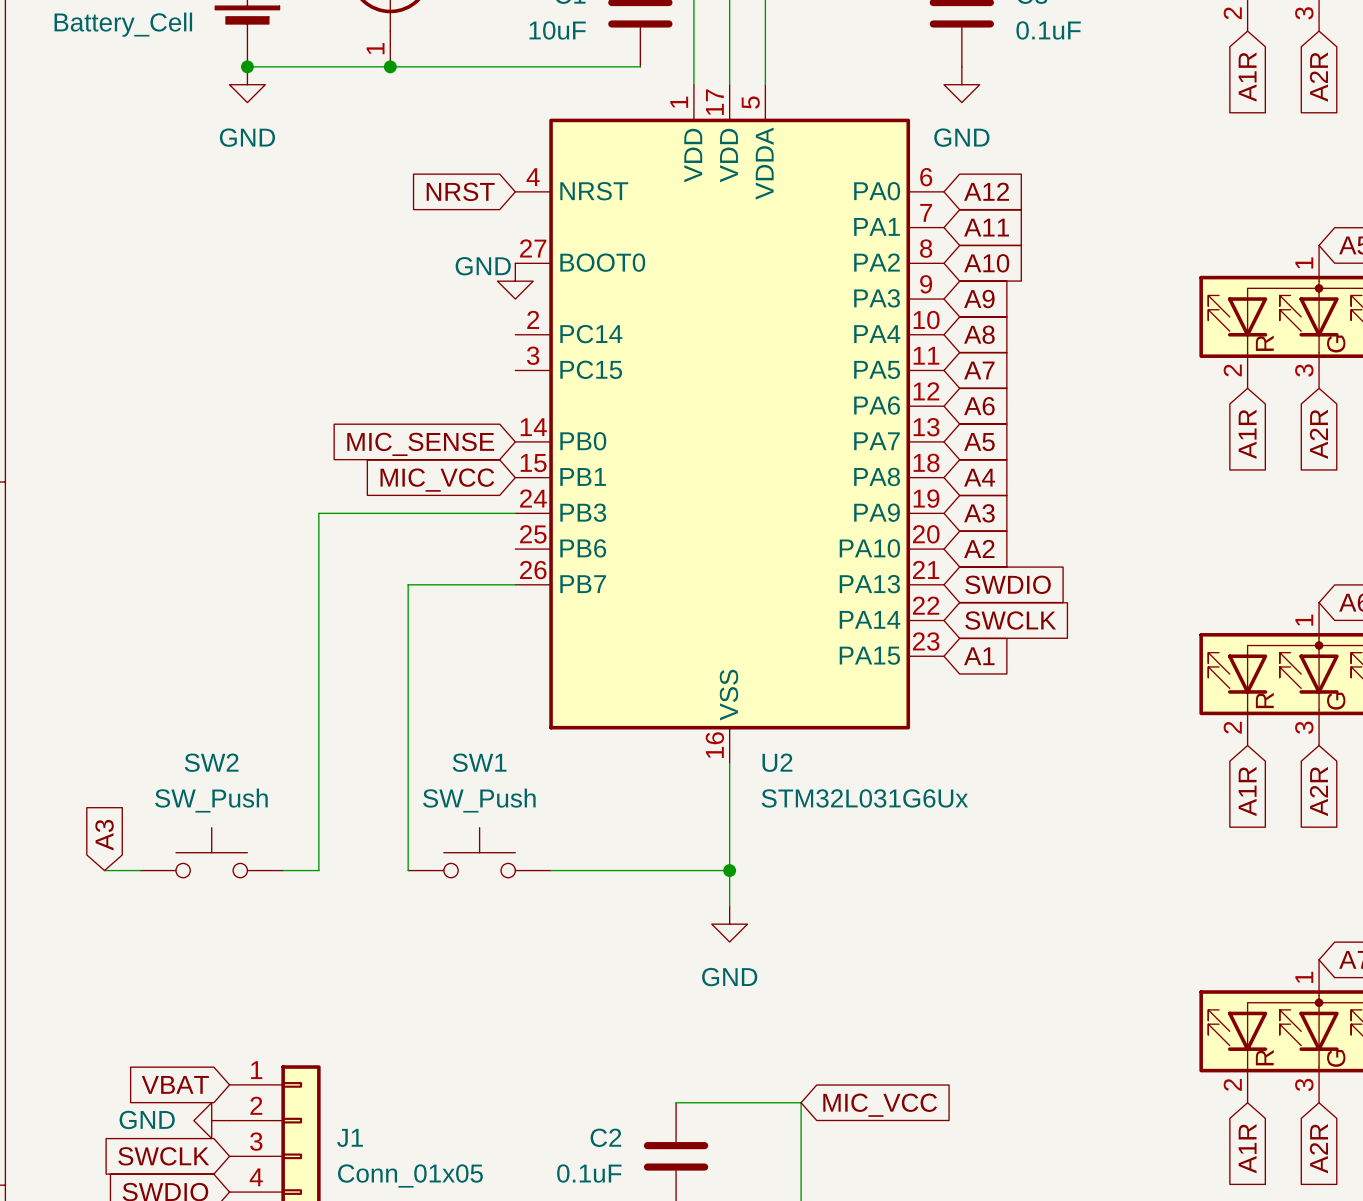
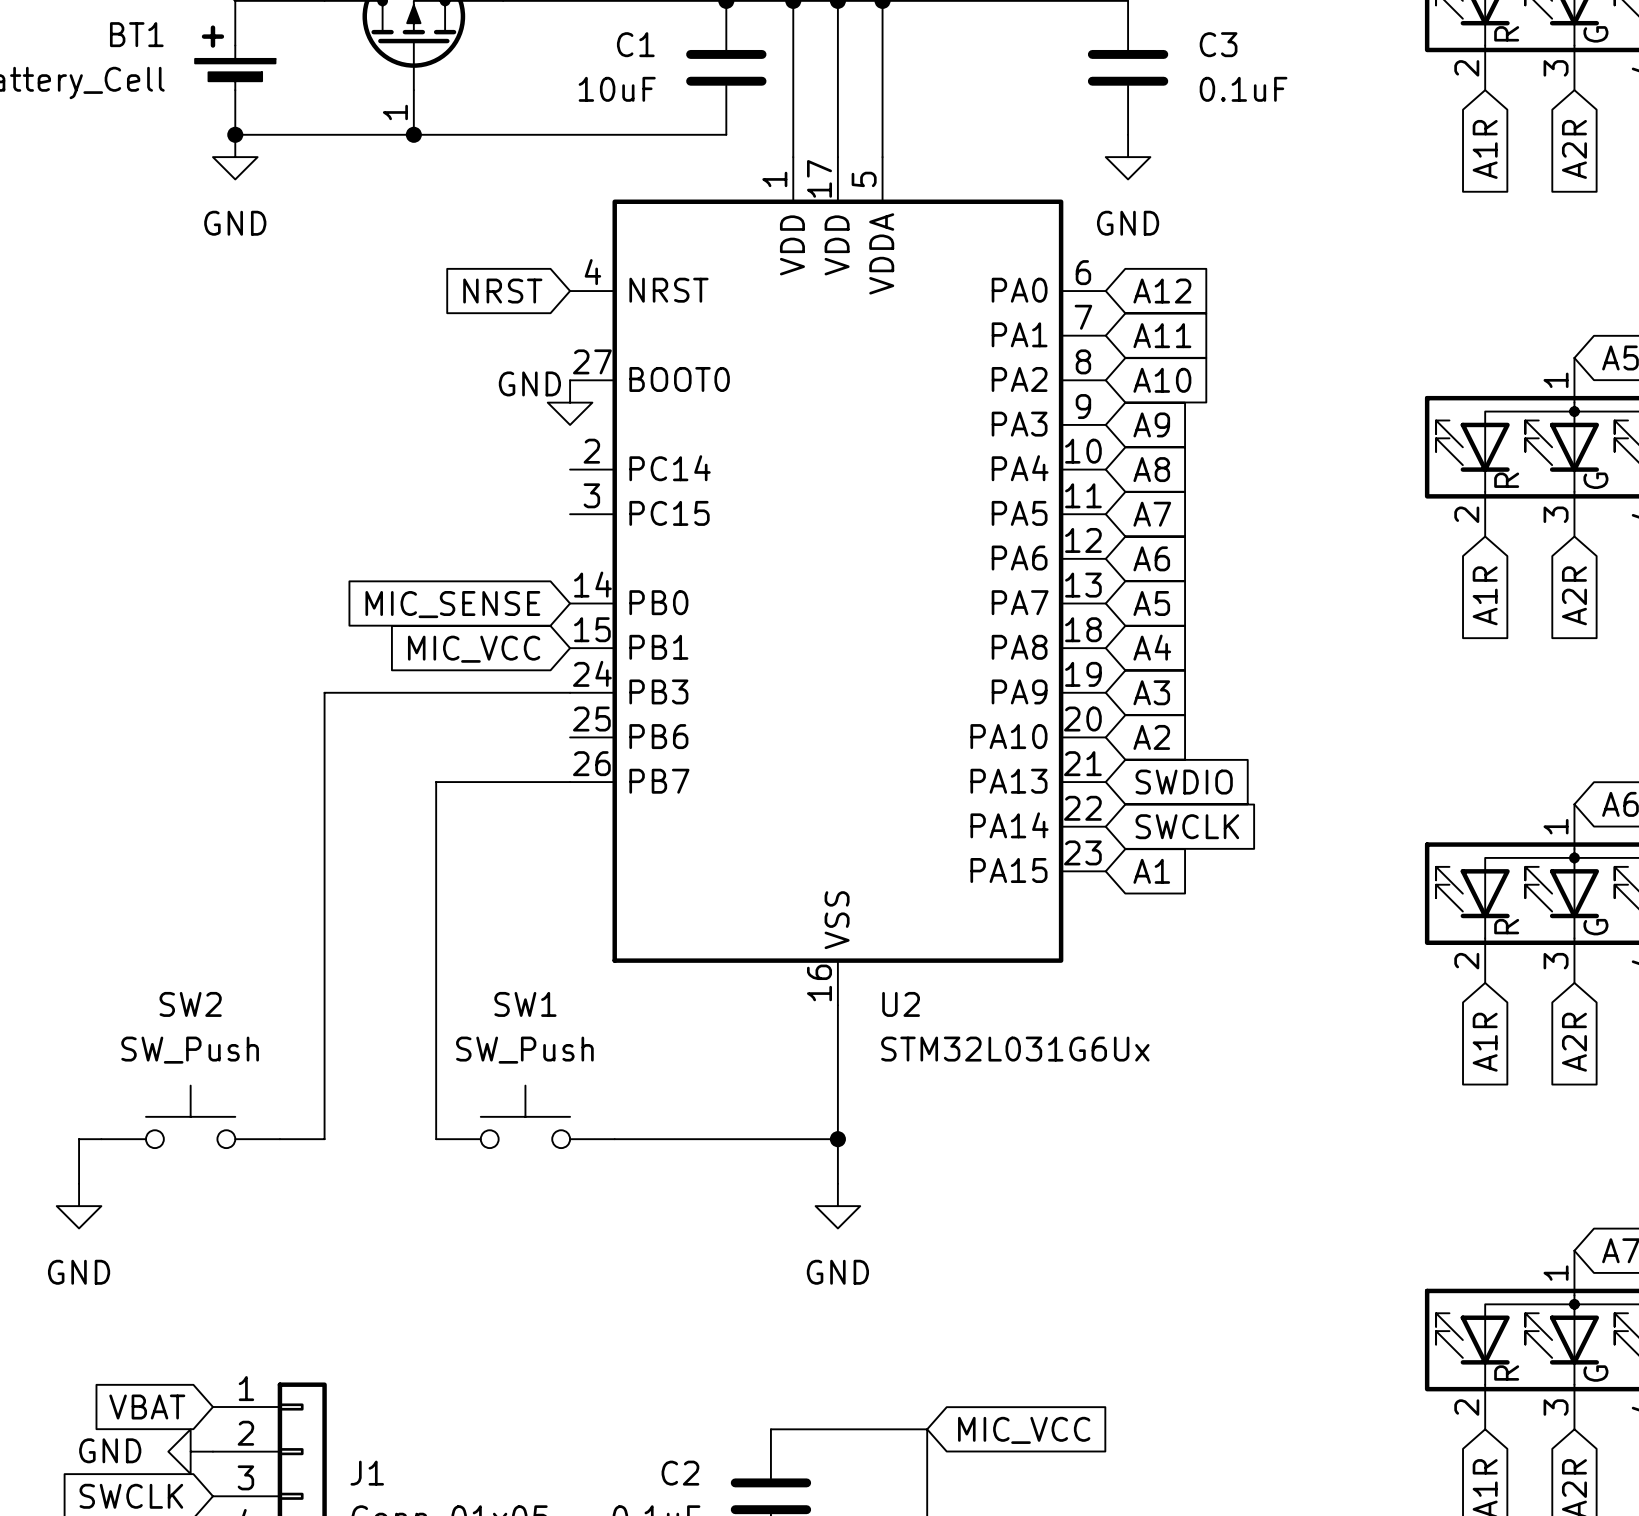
global label: A3 (104, 835) -> none
wire: (104, 870) (122, 870) -> (79, 1183) (79, 1139)
power symbol: none -> GND (79, 1206)

